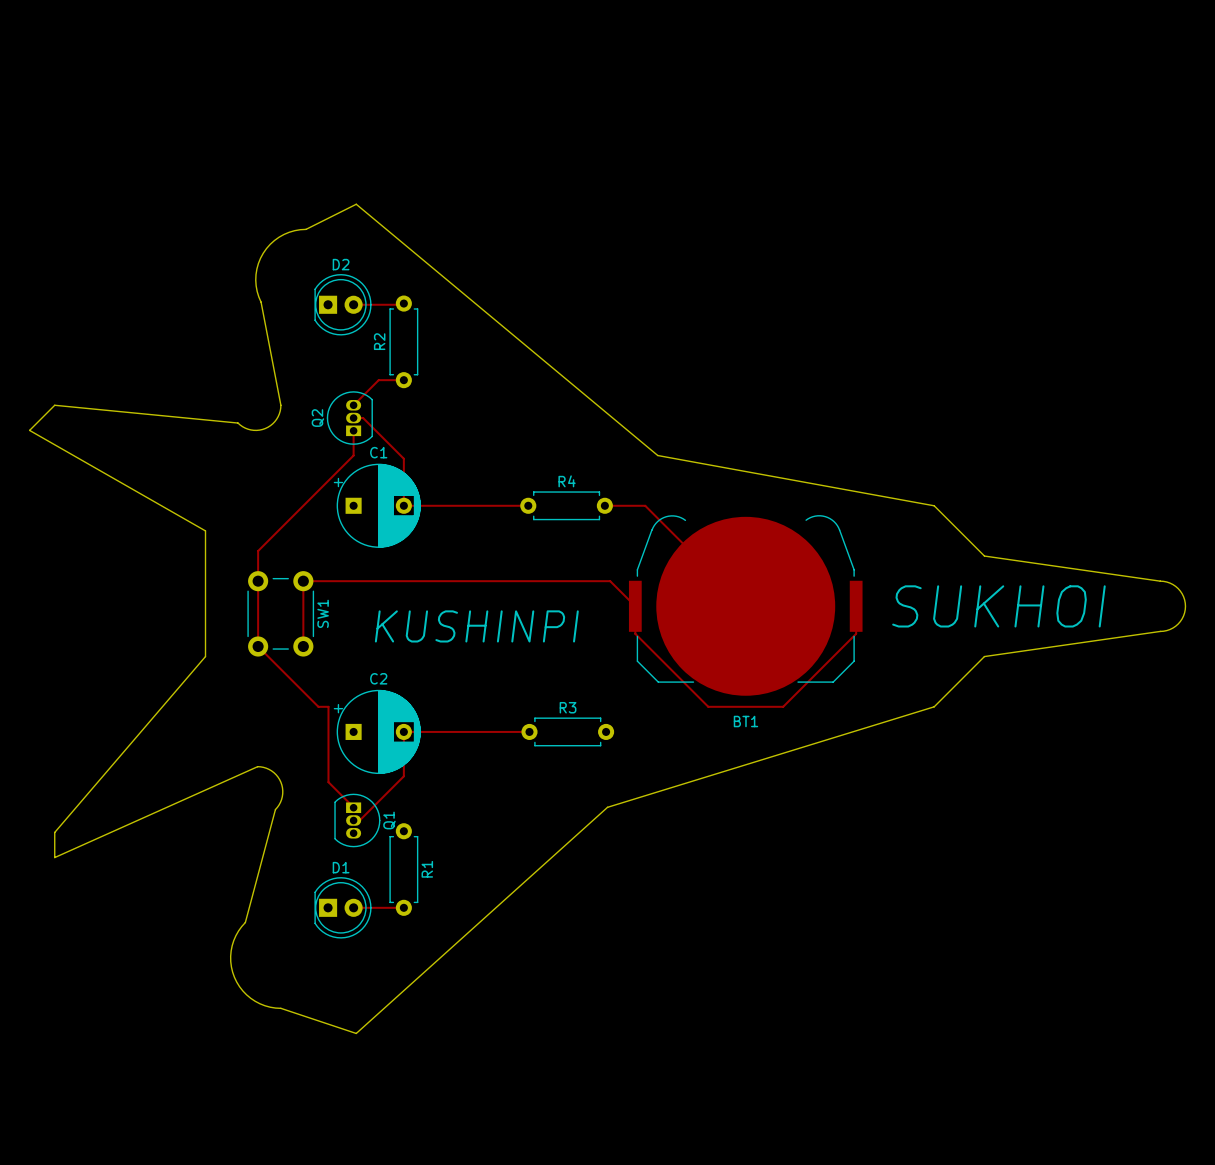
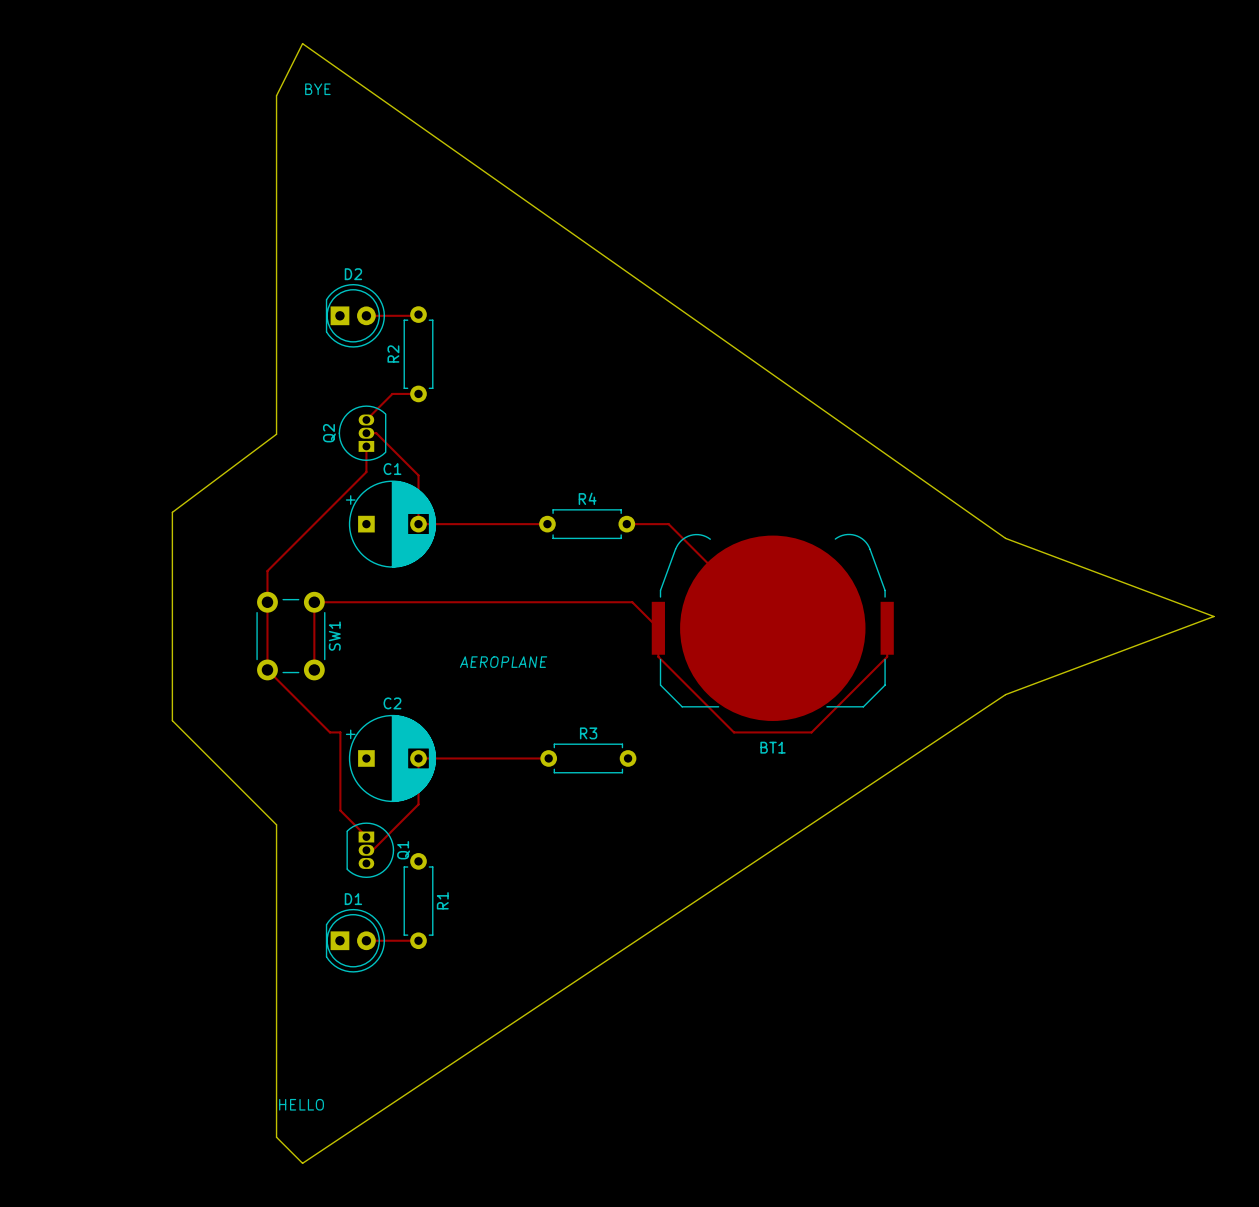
text: none -> BYE (317, 89)
board edge: (356, 204) (306, 229) (289, 232) (279, 237) (266, 248) (258, 263) (256, 285) (261, 302) (280, 405) (278, 416) (270, 425) (262, 429) (253, 430) (245, 428) (237, 423) (54, 405) (29, 430) (205, 530) (205, 656) (54, 832) (54, 857) (257, 766) (271, 770) (280, 782) (282, 796) (275, 809) (245, 922) (235, 935) (230, 956) (232, 972) (239, 986) (246, 994) (260, 1003) (280, 1008) (356, 1033) (607, 807) (934, 706) (984, 656) (1163, 631) (1172, 628) (1182, 618) (1185, 606) (1183, 596) (1178, 588) (1169, 583) (984, 556) (934, 505) (657, 455) (356, 204) -> (302, 43) (276, 95) (276, 434) (172, 512) (172, 720) (276, 824) (276, 1137) (302, 1163) (1005, 694) (1213, 616) (1005, 538) (302, 43)
text: SUKHOI (998, 606) -> none
text: KUSHINPI (476, 626) -> none
text: none -> AEROPLANE (503, 662)
text: none -> HELLO (301, 1104)

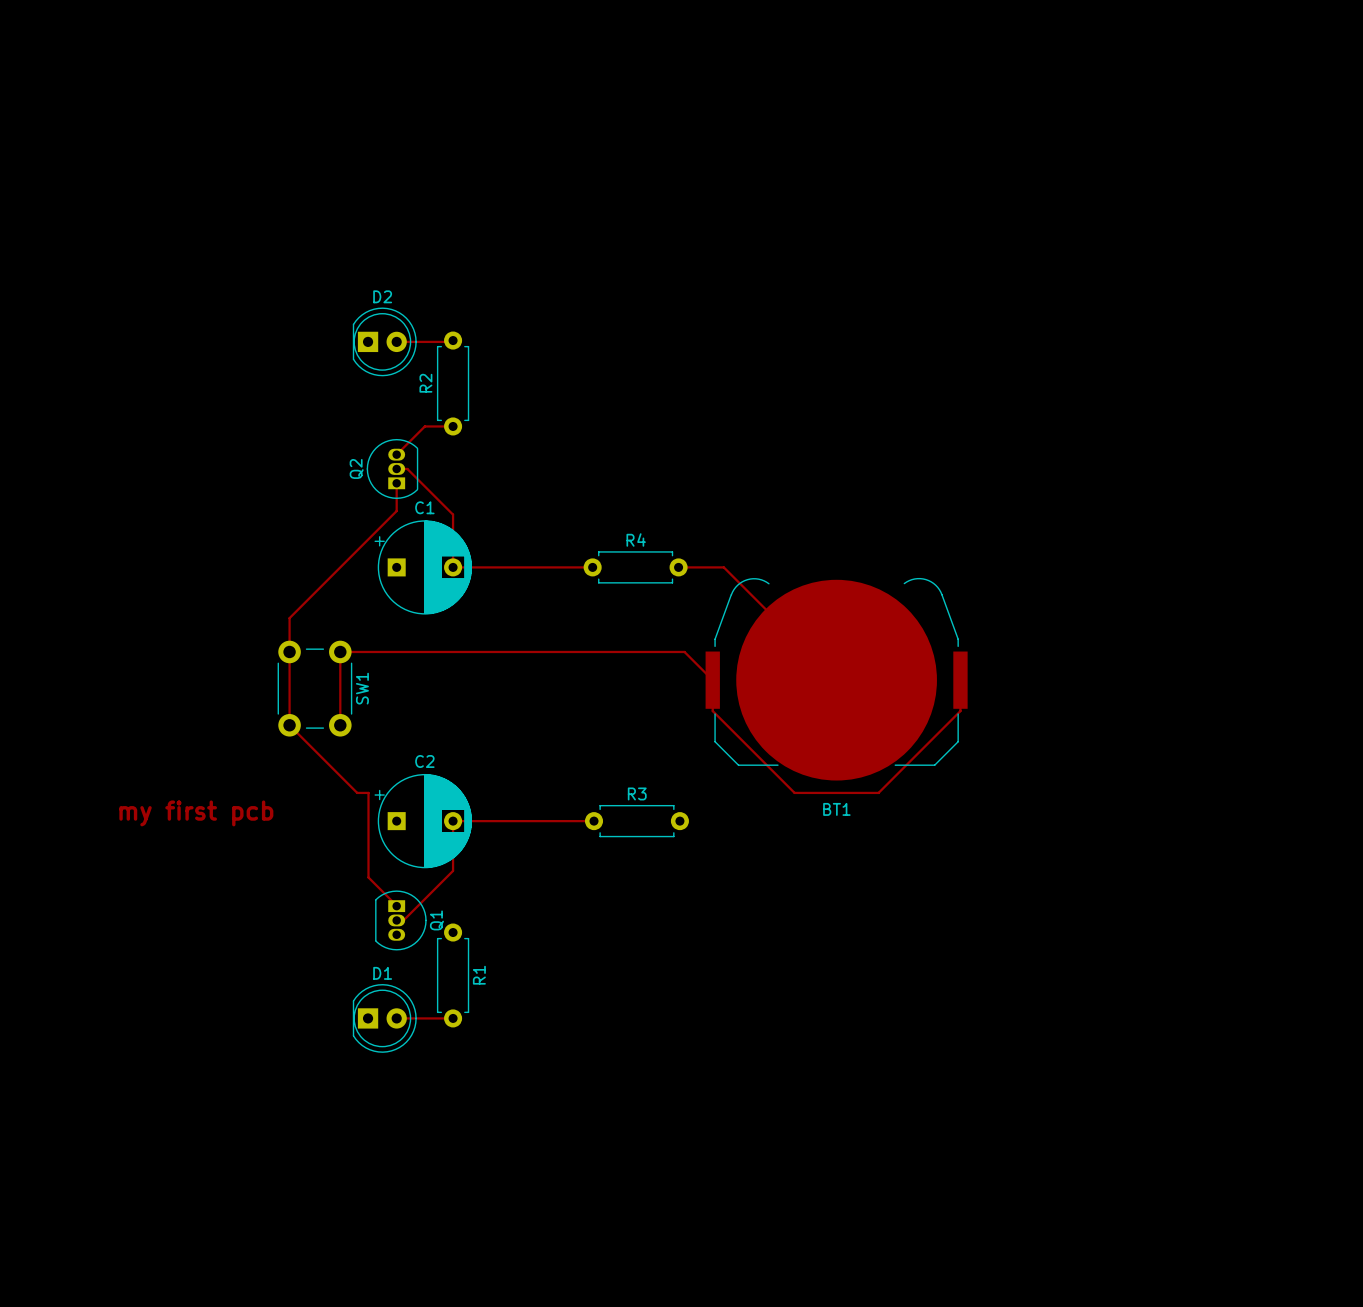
board edge: (302, 43) (276, 95) (276, 434) (172, 512) (172, 720) (276, 824) (276, 1137) (302, 1163) (1005, 694) (1213, 616) (1005, 538) (302, 43) -> none
text: BYE (317, 89) -> none
text: AEROPLANE (503, 662) -> none
text: none -> my first pcb (196, 813)
text: HELLO (301, 1104) -> none

